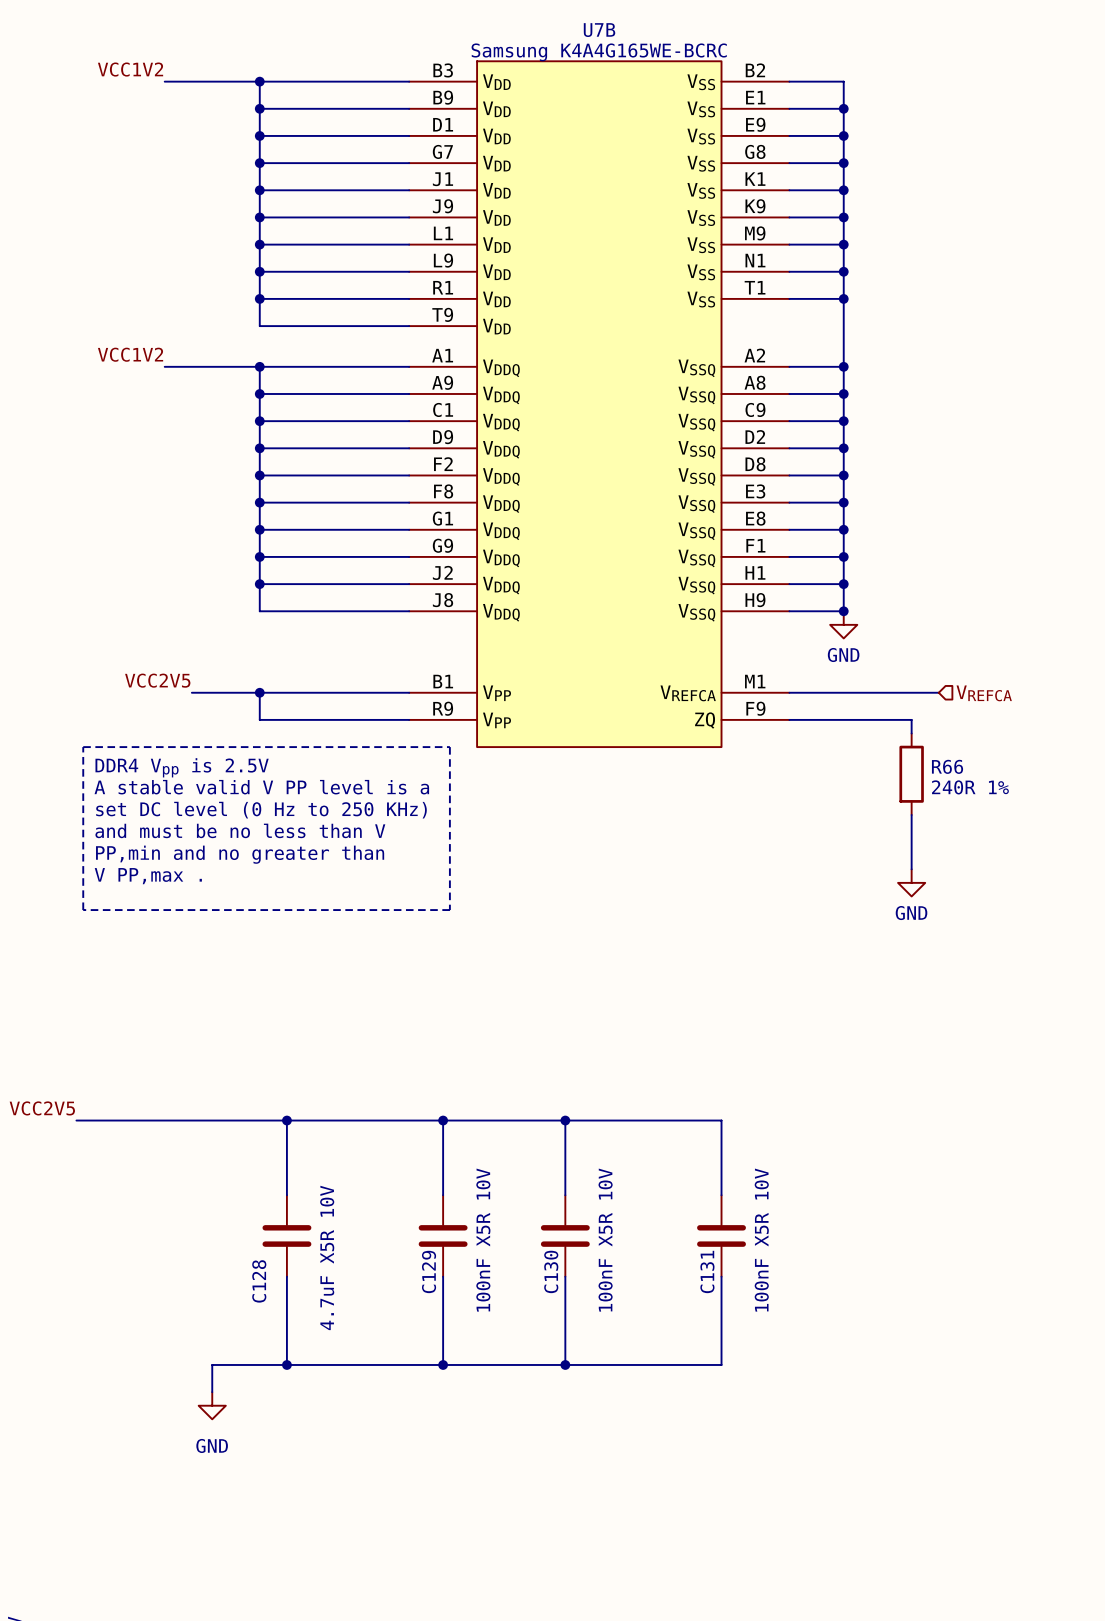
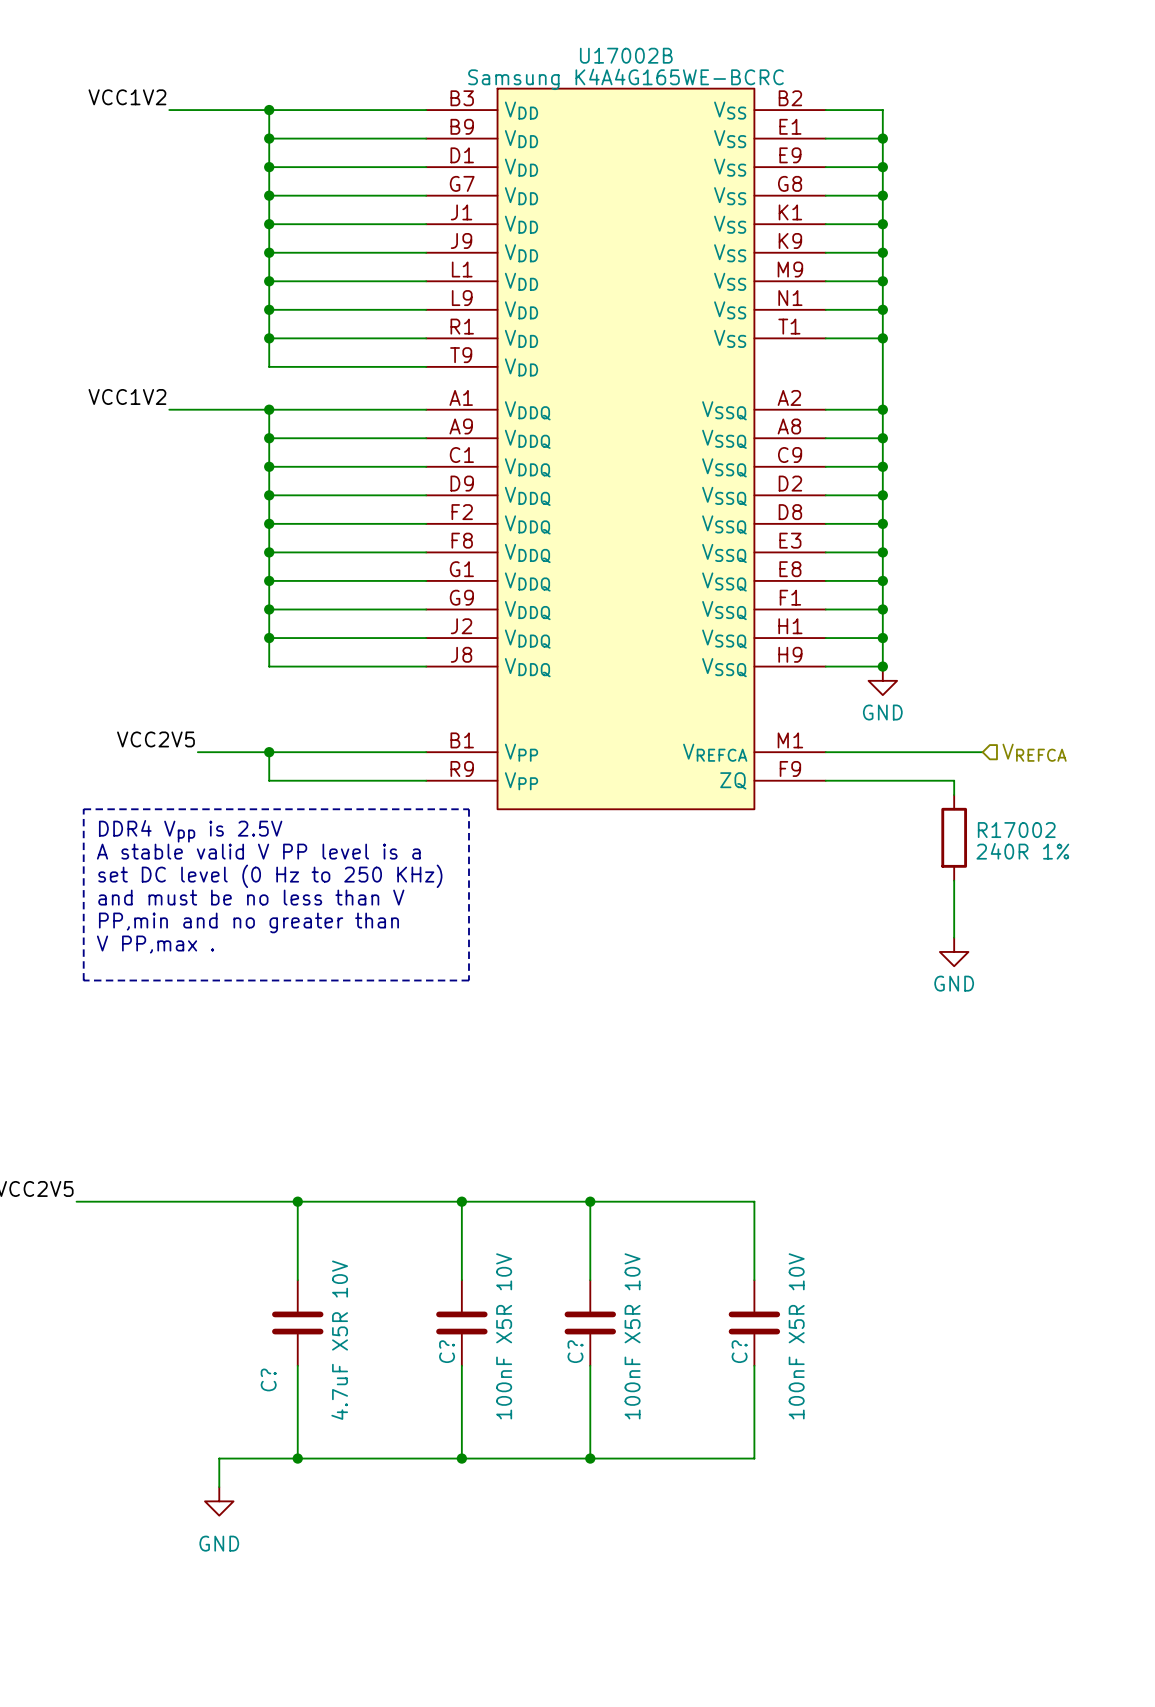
U7B name: U7B (599, 30) -> U17002B (626, 55)
R66 name: R66 (947, 766) -> R17002 (1016, 830)
C129 name: C129 (429, 1271) -> C? (447, 1351)
C130 name: C130 (551, 1271) -> C? (575, 1351)
C131 name: C131 (707, 1271) -> C? (739, 1351)
C128 name: C128 (259, 1281) -> C? (268, 1379)

